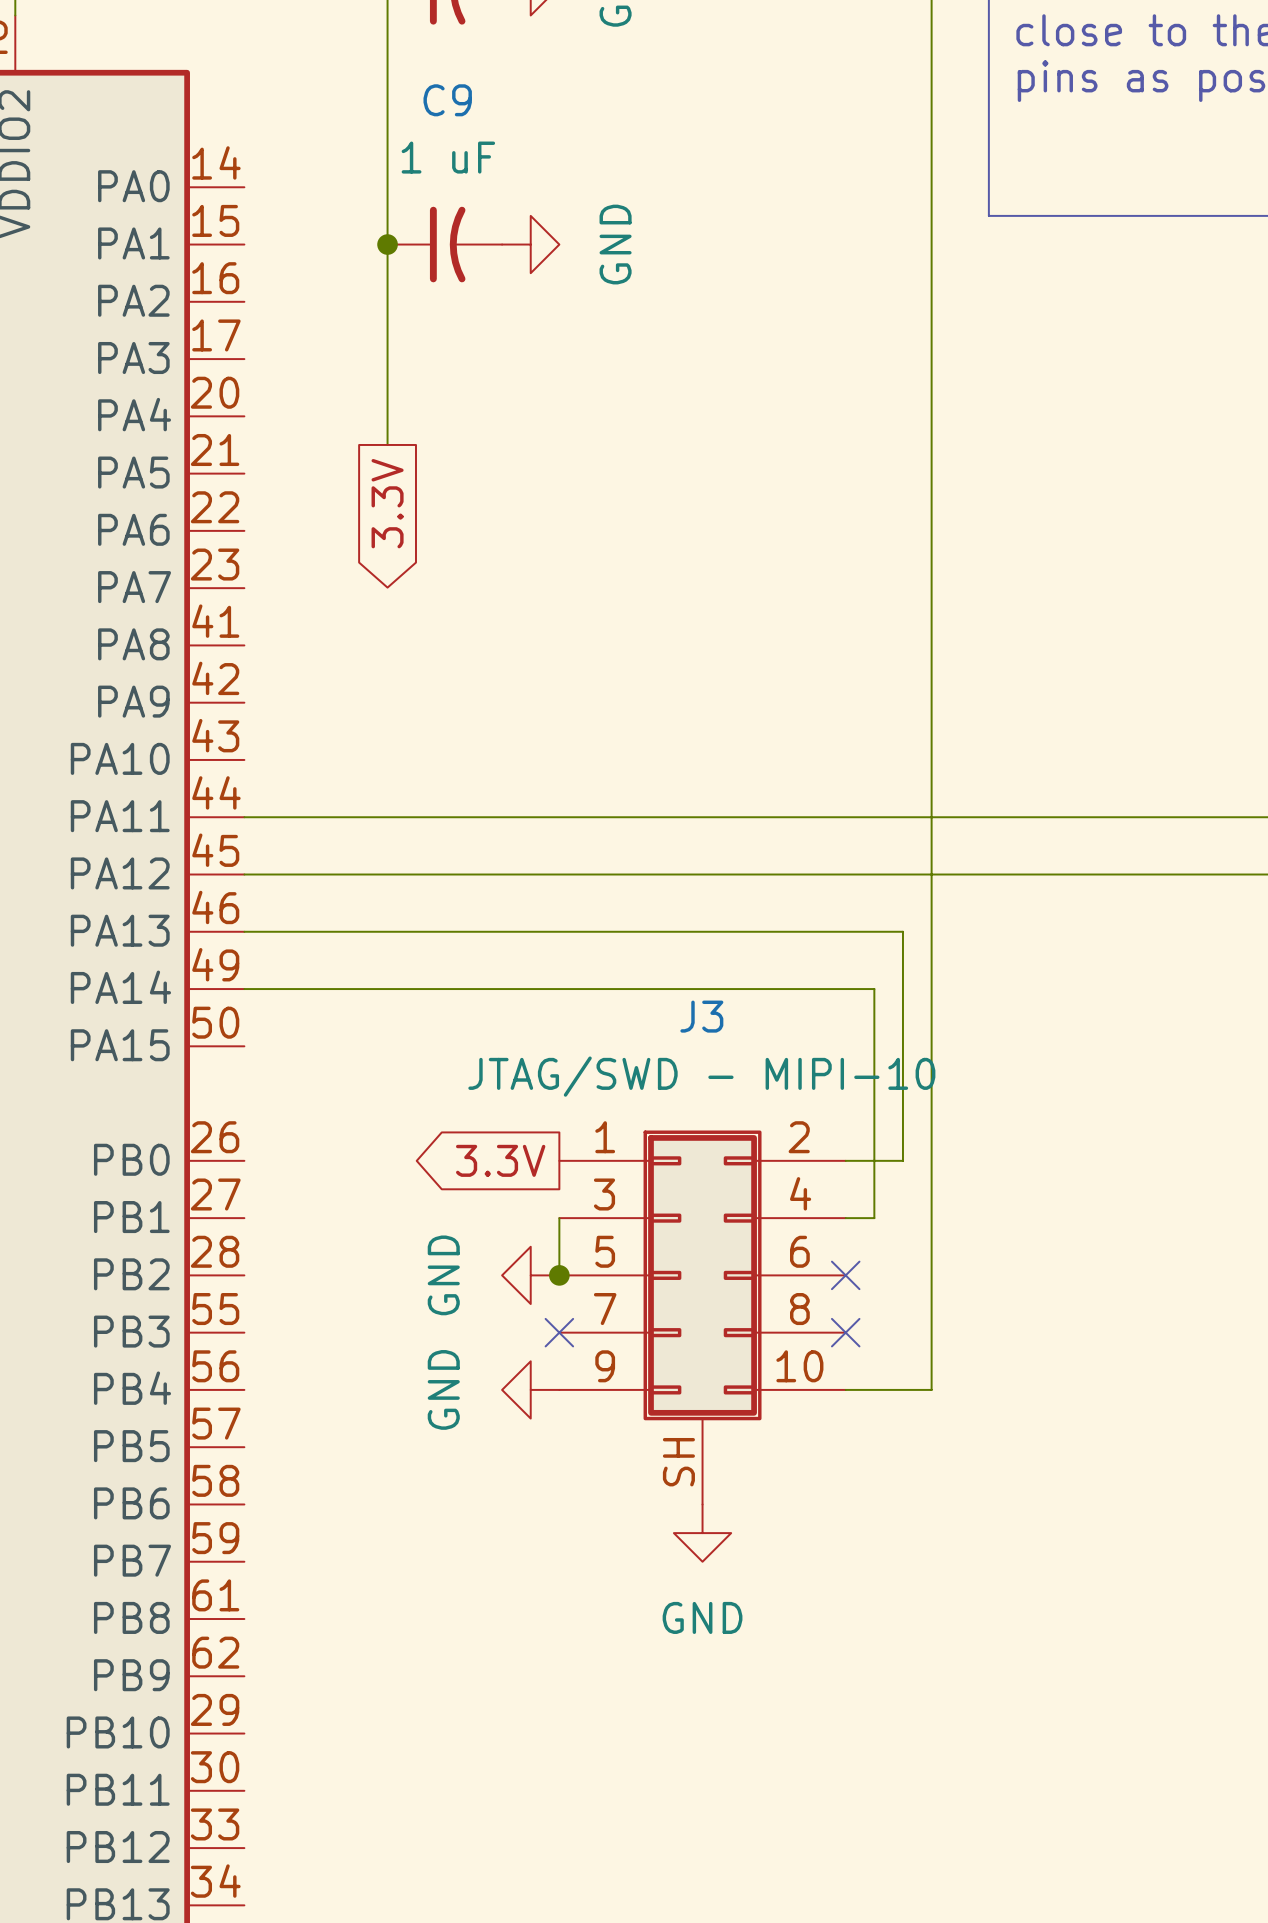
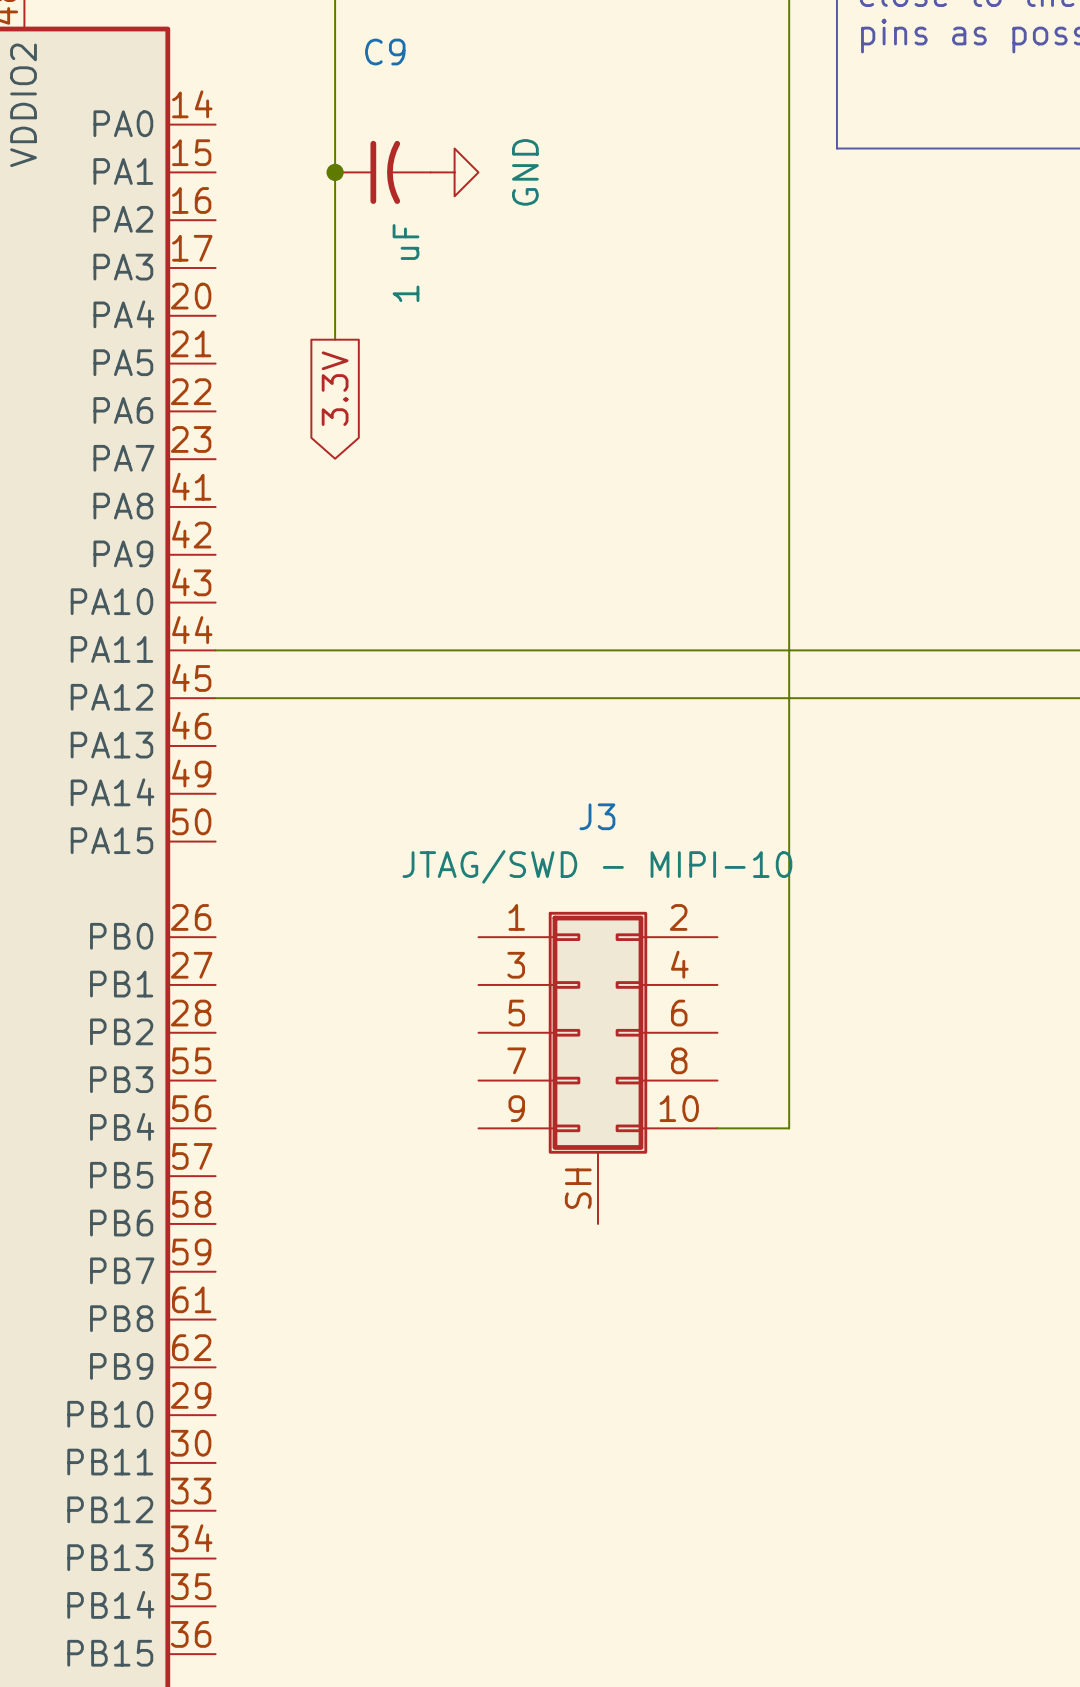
C9 value rotation: 0° (448, 157) -> 90° counterclockwise (406, 263)
C9 value position: 1 uF (448, 157) -> 1 uF (406, 263)
wire: (244, 931) (902, 931) (902, 1160) (845, 1160) -> none
wire: (244, 989) (874, 989) (874, 1218) (845, 1218) -> none
global label: 3.3V (500, 1160) -> none
wire: (559, 1218) (559, 1275) -> none
power symbol: GND (530, 1275) -> none
junction: (559, 1275) -> none
no-connect mark: (845, 1275) -> none
no-connect mark: (559, 1332) -> none
no-connect mark: (845, 1332) -> none
power symbol: GND (530, 1389) -> none
power symbol: GND (702, 1533) -> none

